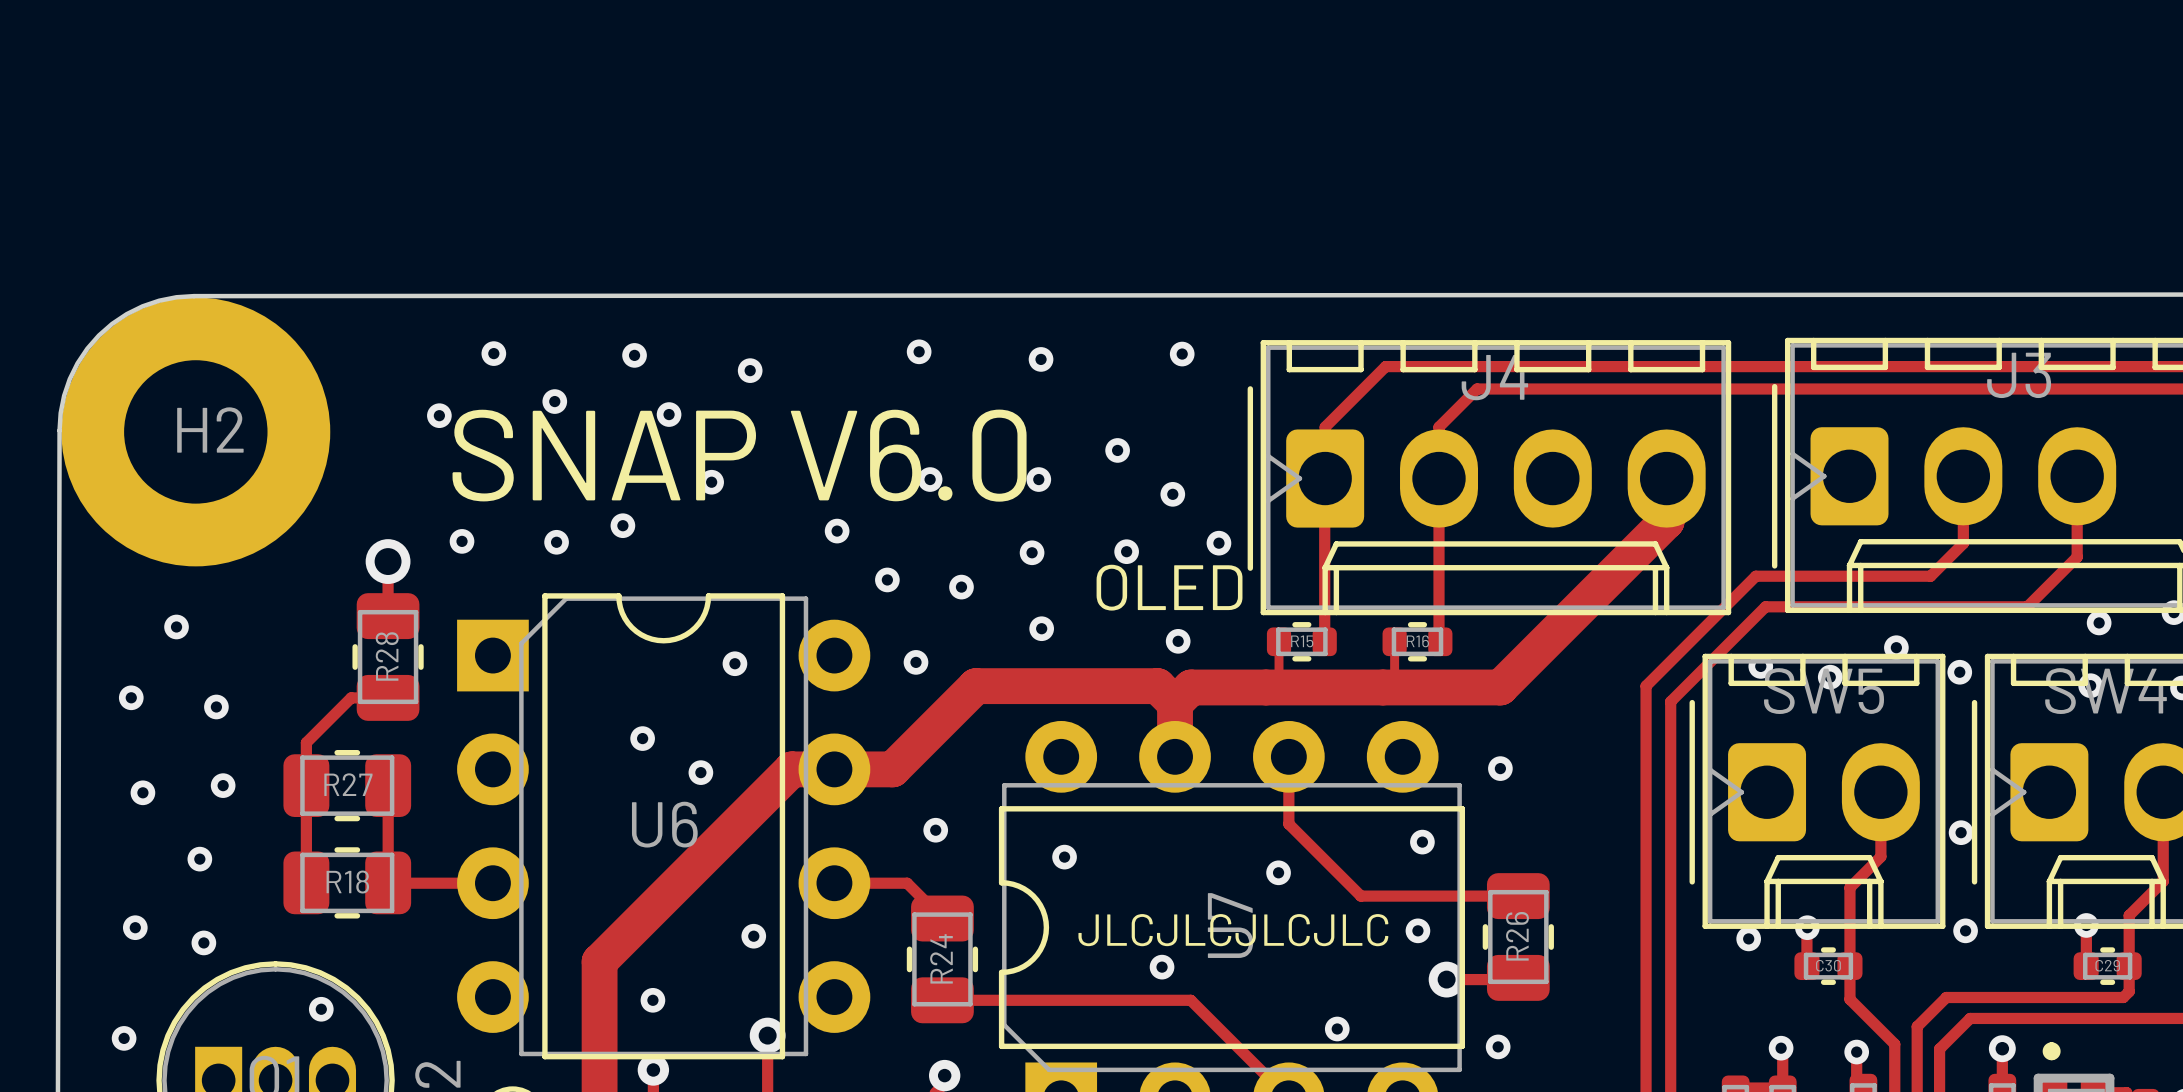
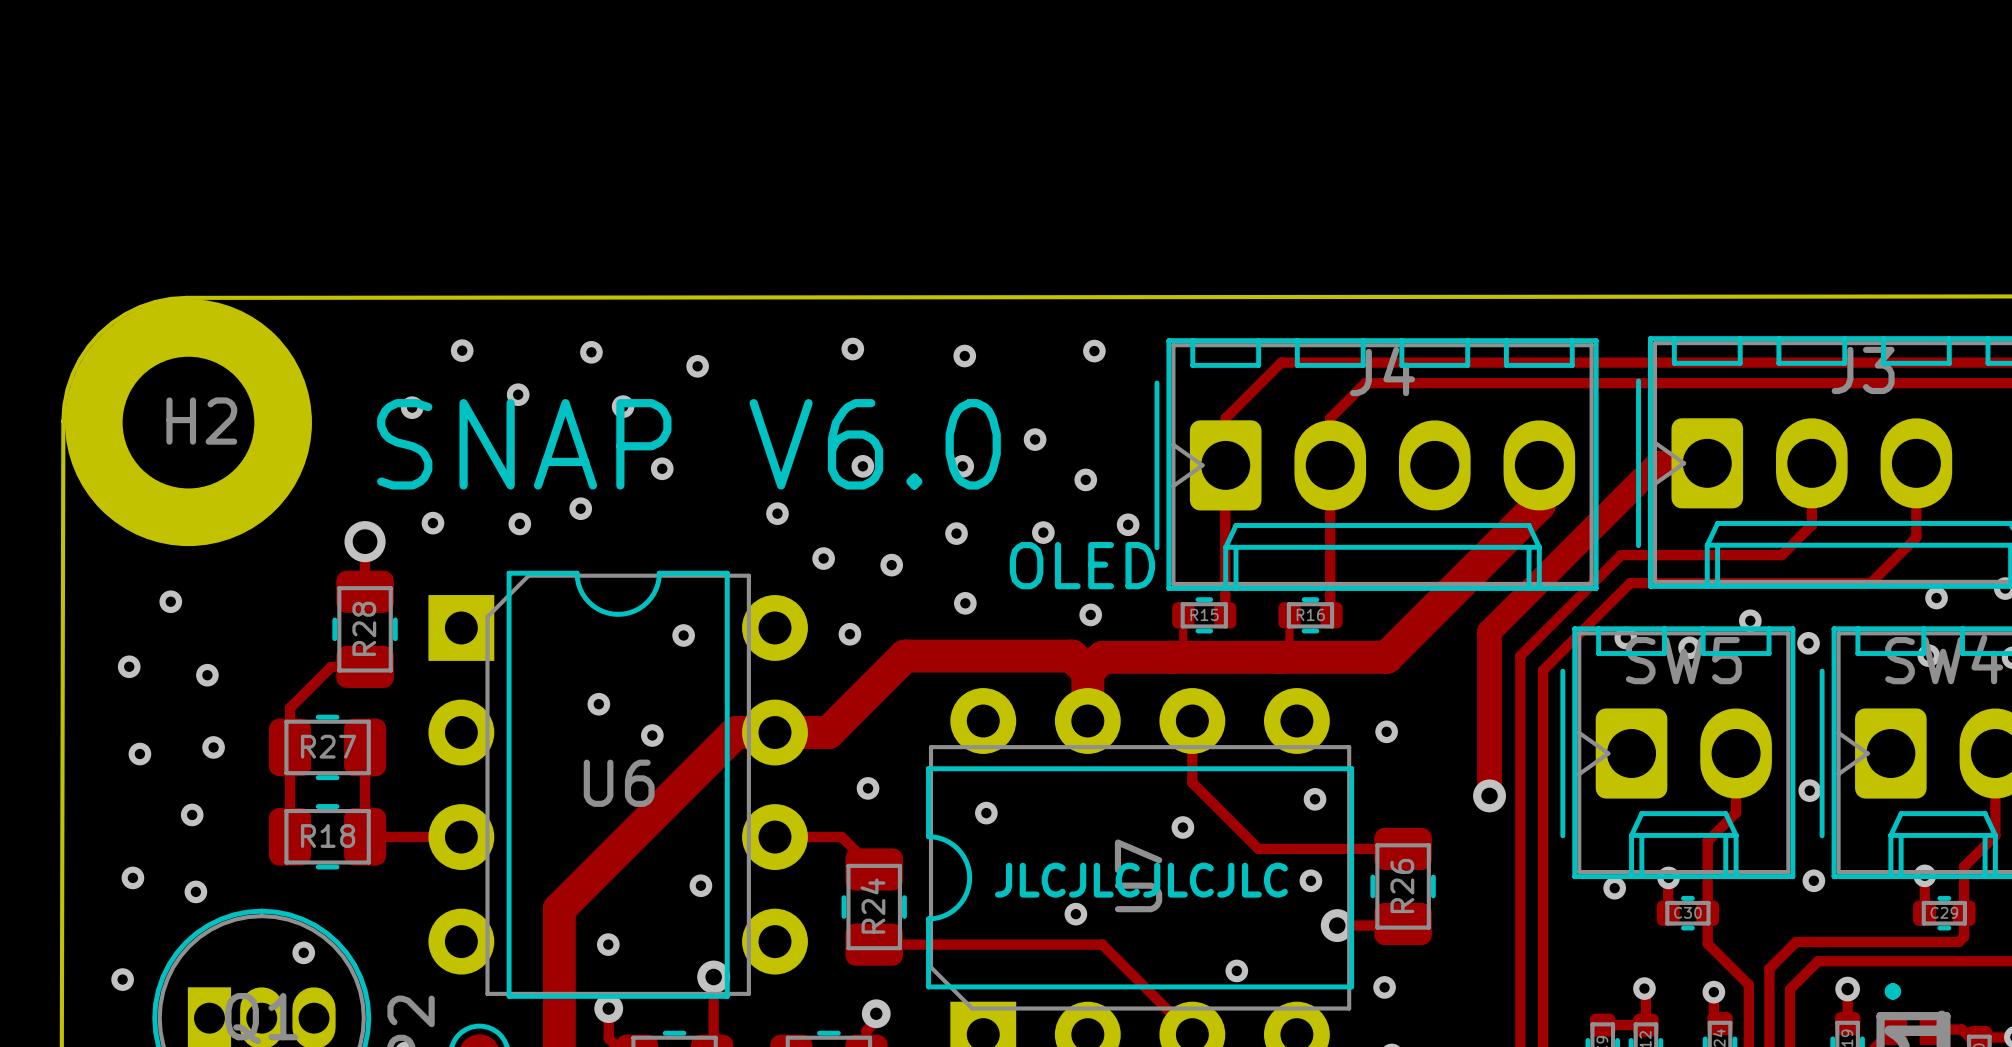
track: none -> (1707, 463) (1657, 463) (1489, 631) (1489, 795)
via: none -> (1489, 795)

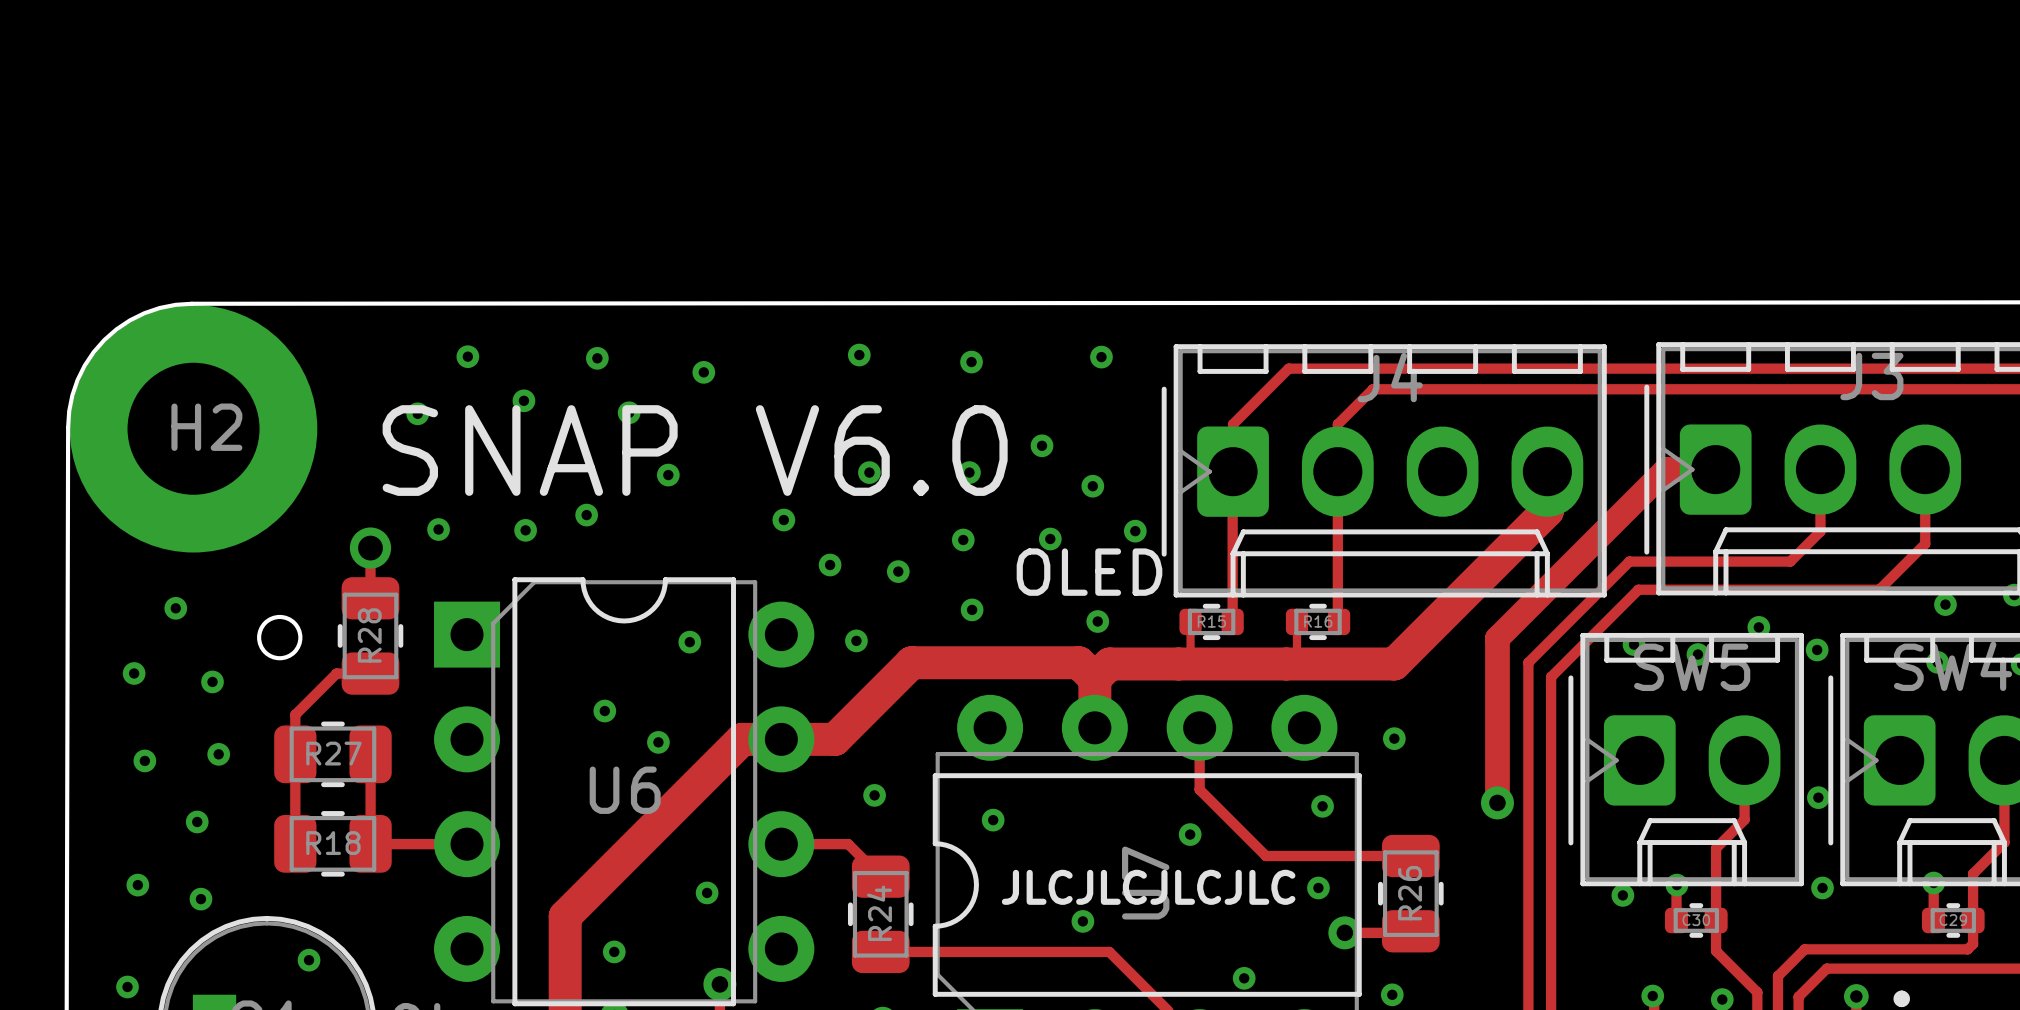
round board edge: none -> [257, 614, 303, 661]

